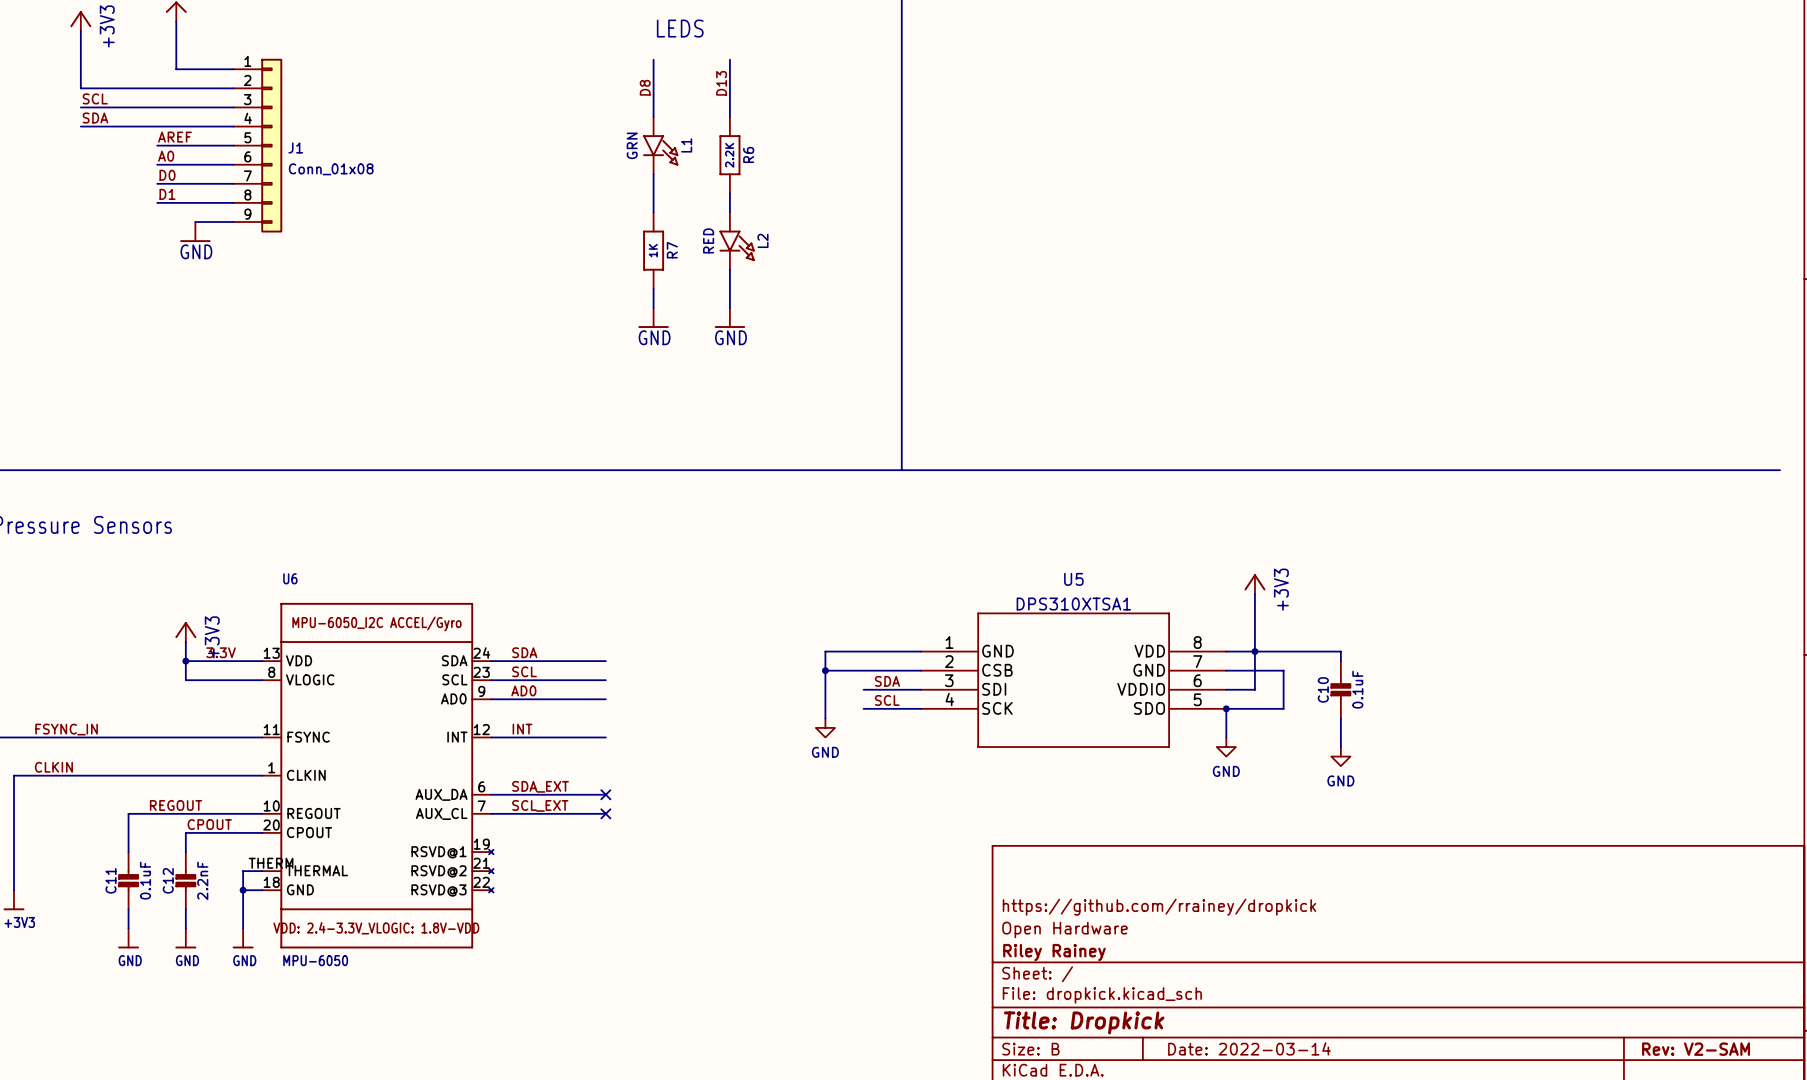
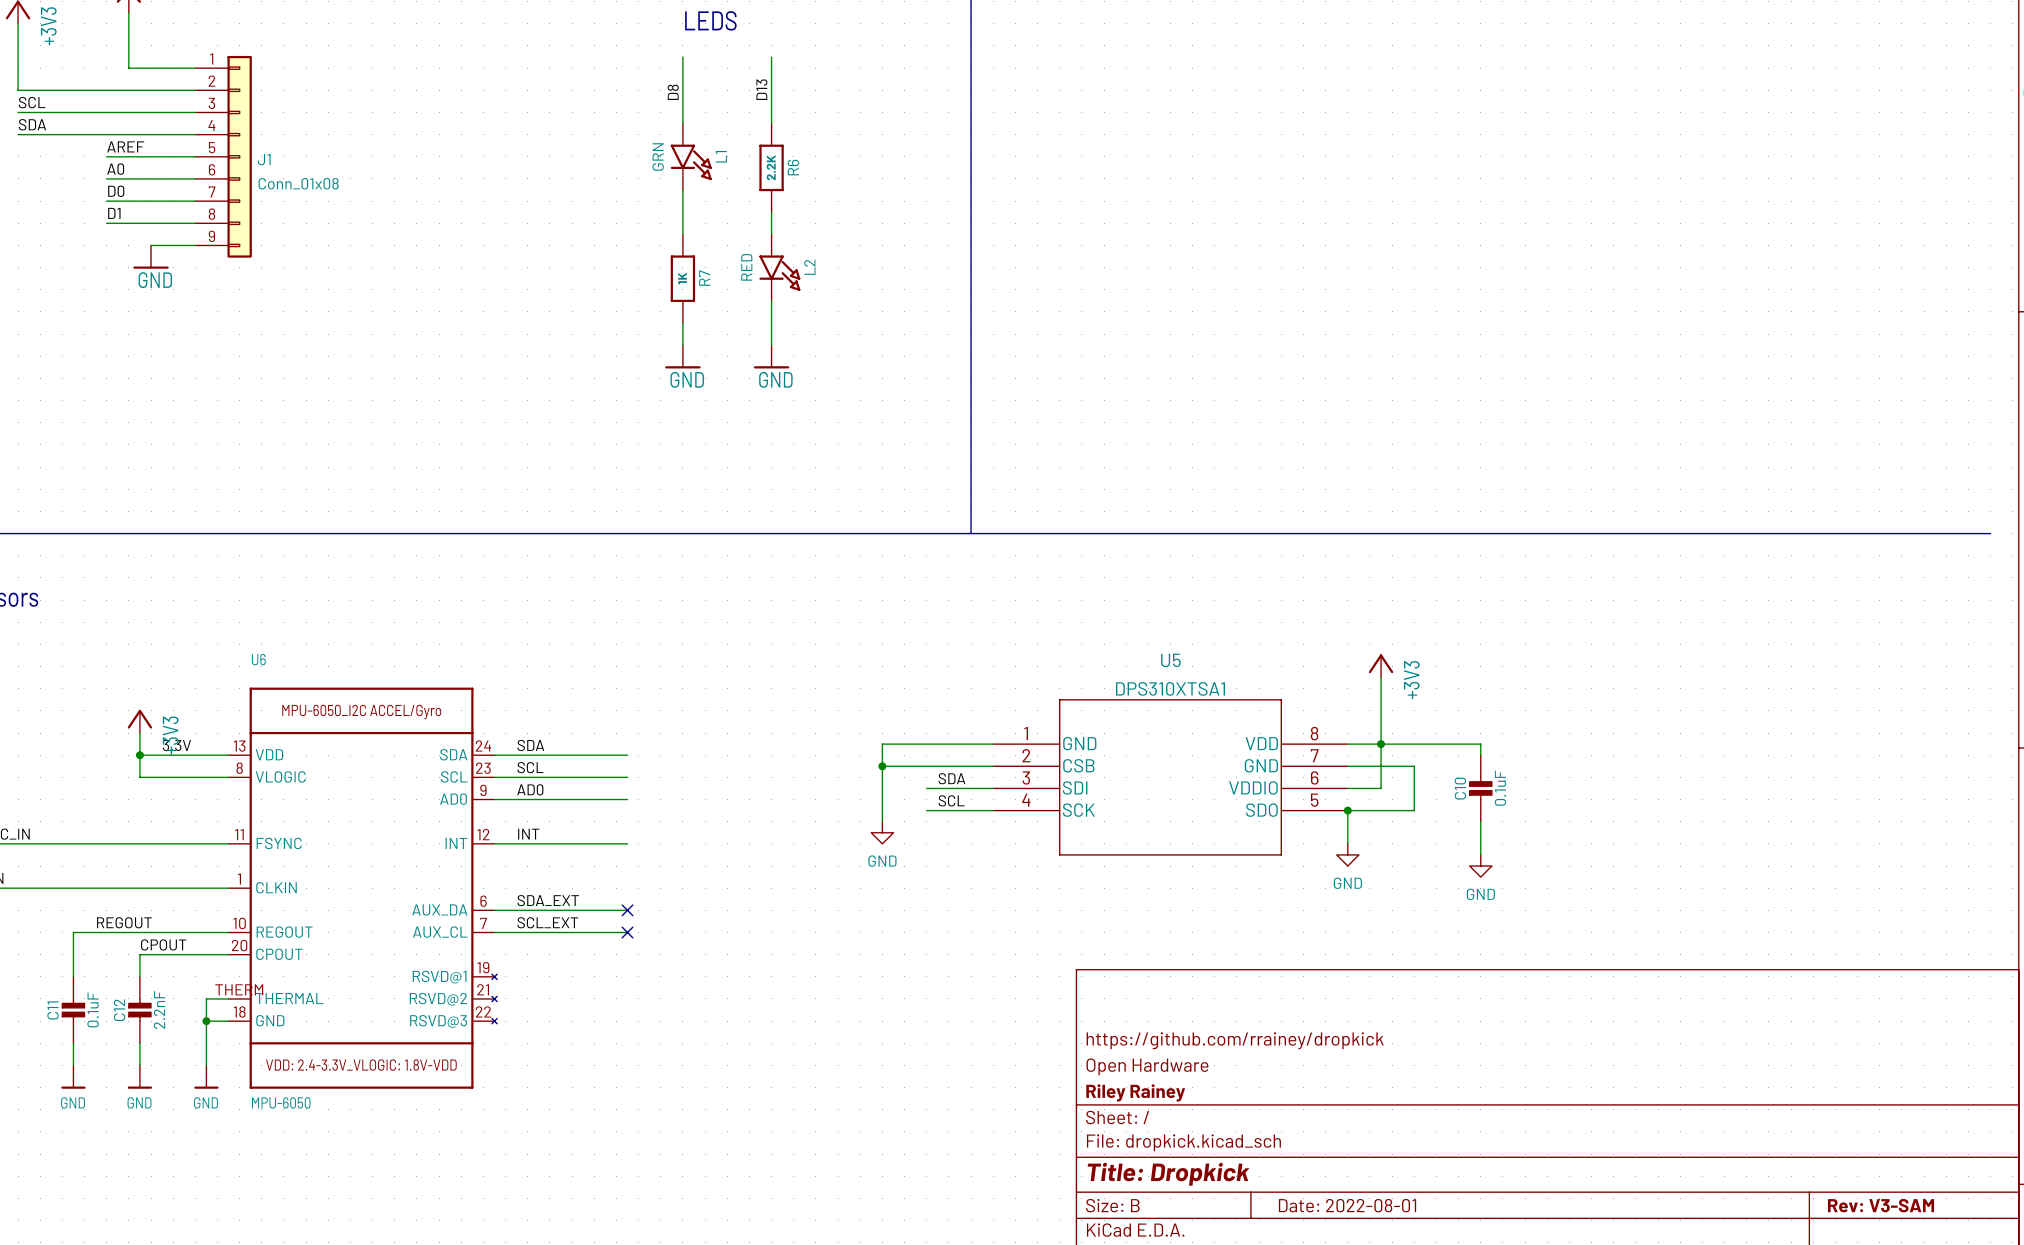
title block: Date: 2022-03-14 (1249, 1048) -> Date: 2022-08-01 (1347, 1205)
title block: Rev: V2-SAM (1696, 1049) -> Rev: V3-SAM (1881, 1205)

